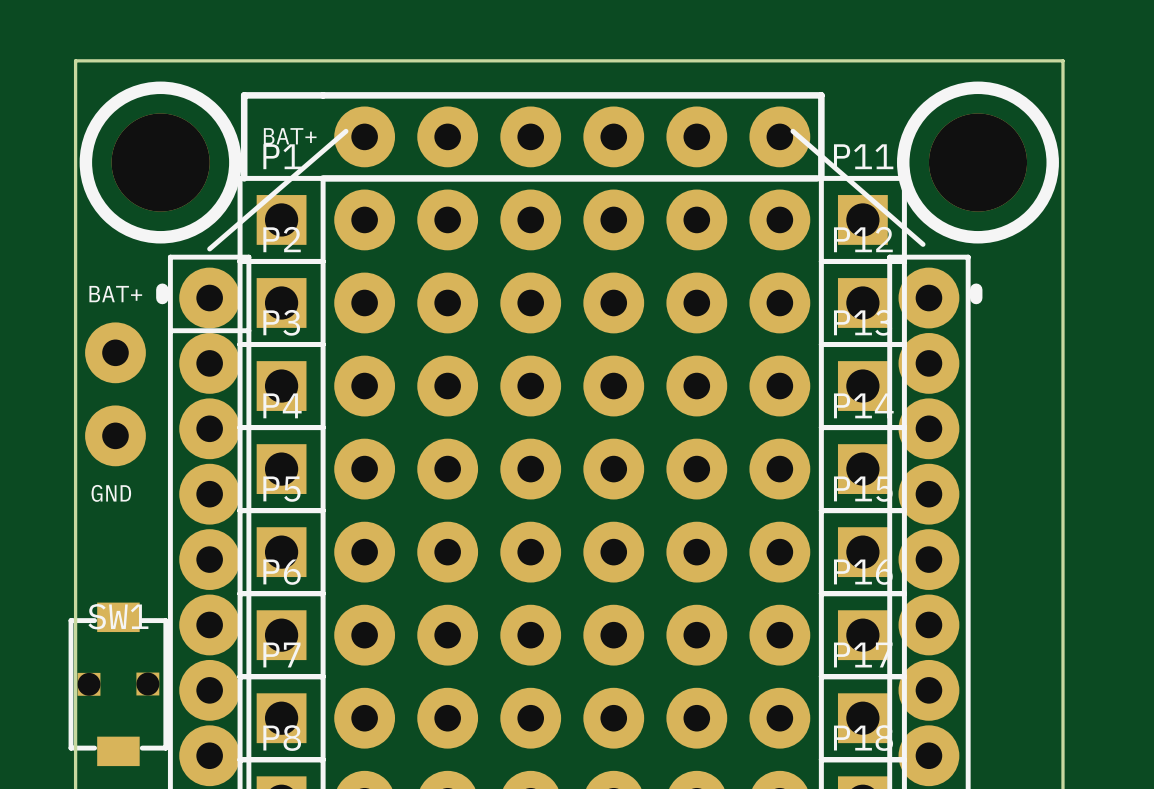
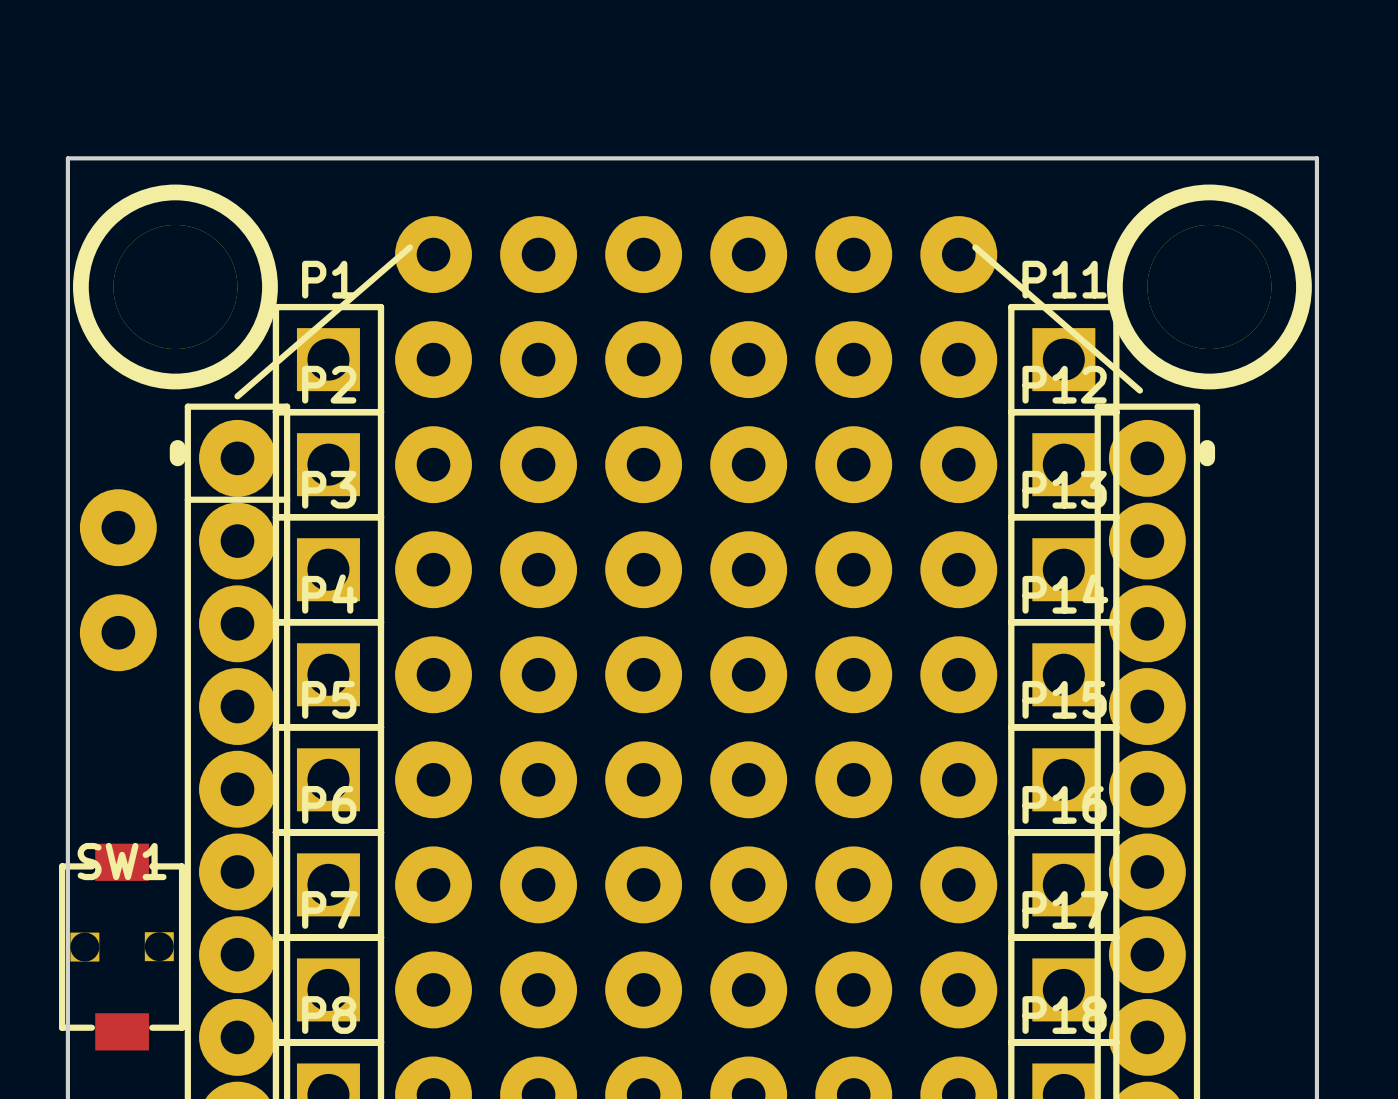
text: BAT+ (290, 136) -> none
line: (244, 178) (244, 95) (821, 95) (821, 178) -> none
line: (323, 178) (817, 178) -> none
text: BAT+ (115, 294) -> none
text: GND (111, 493) -> none

